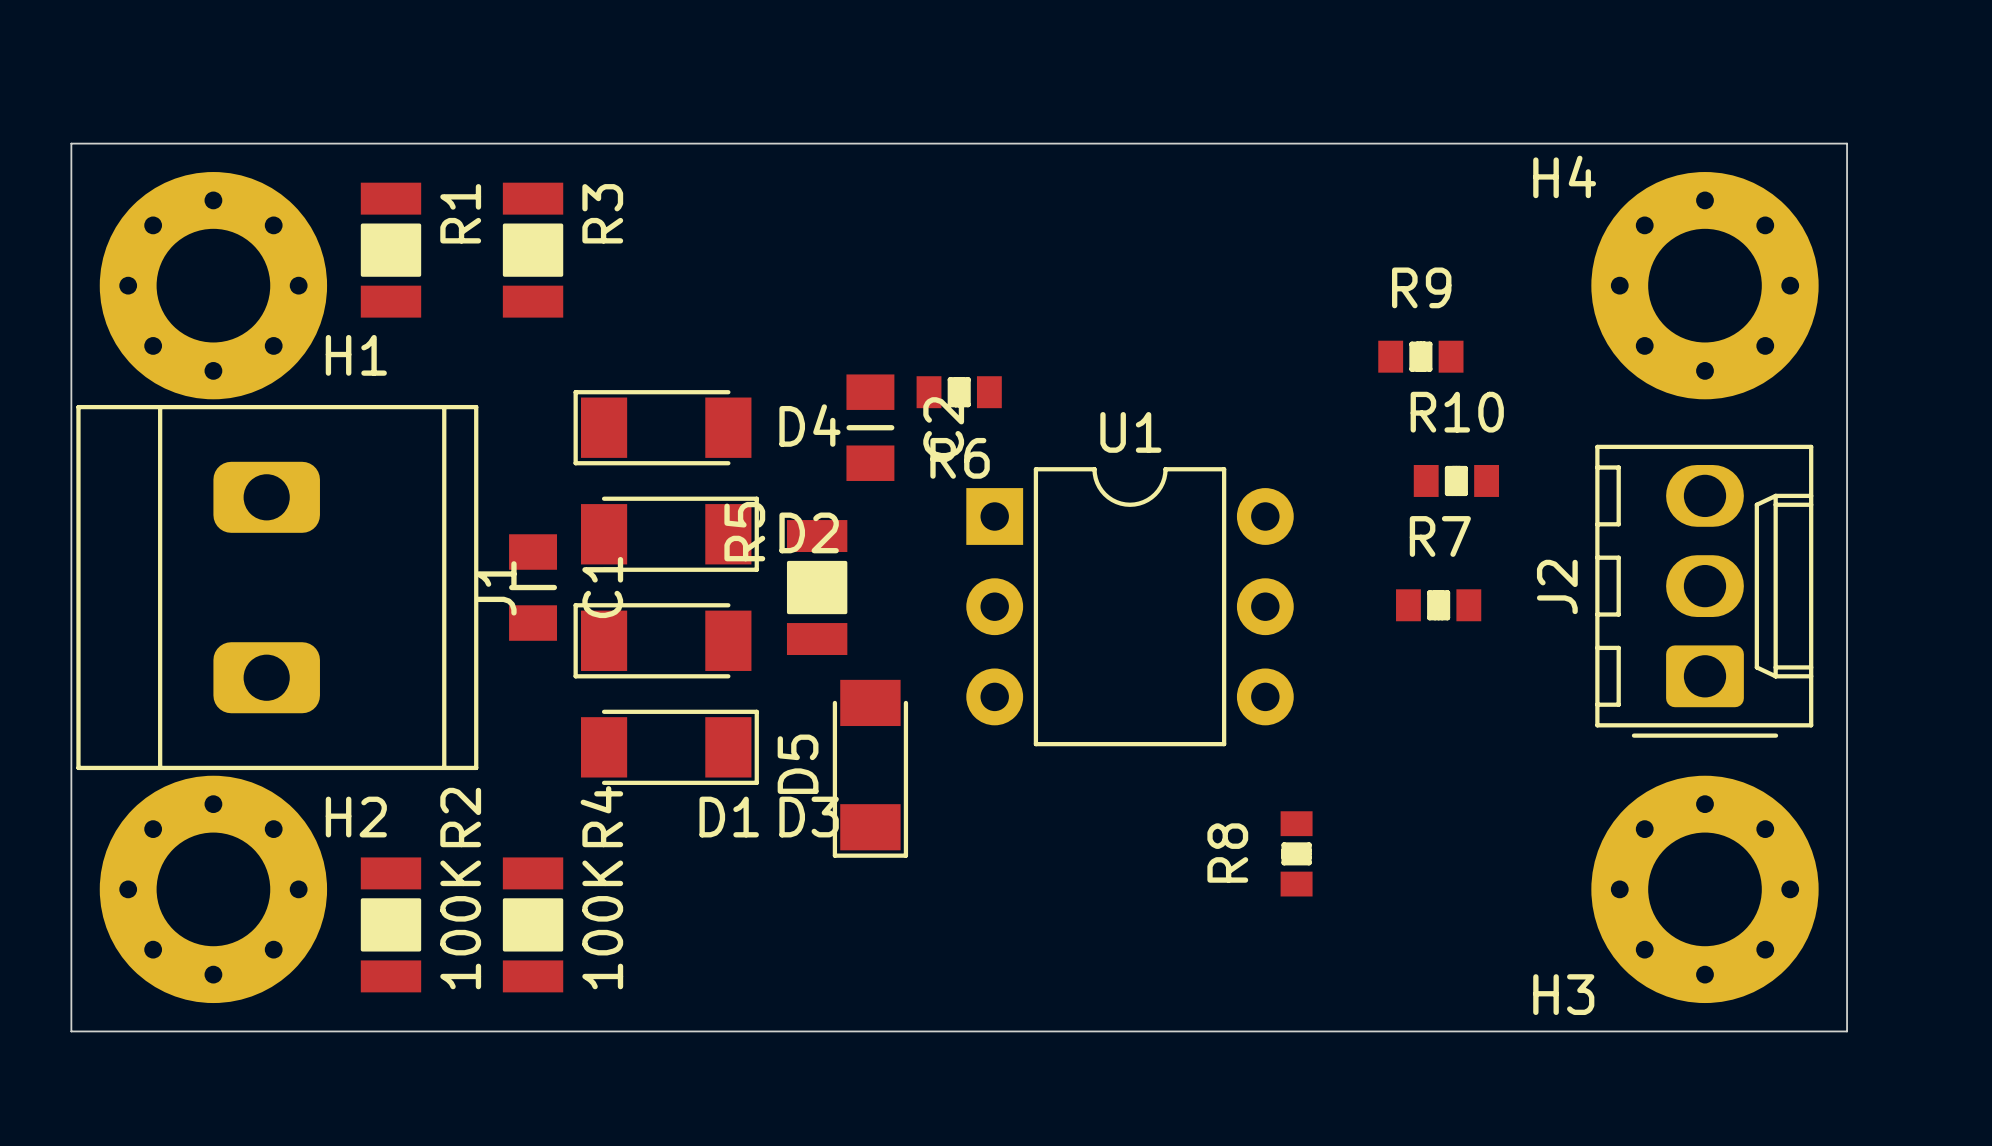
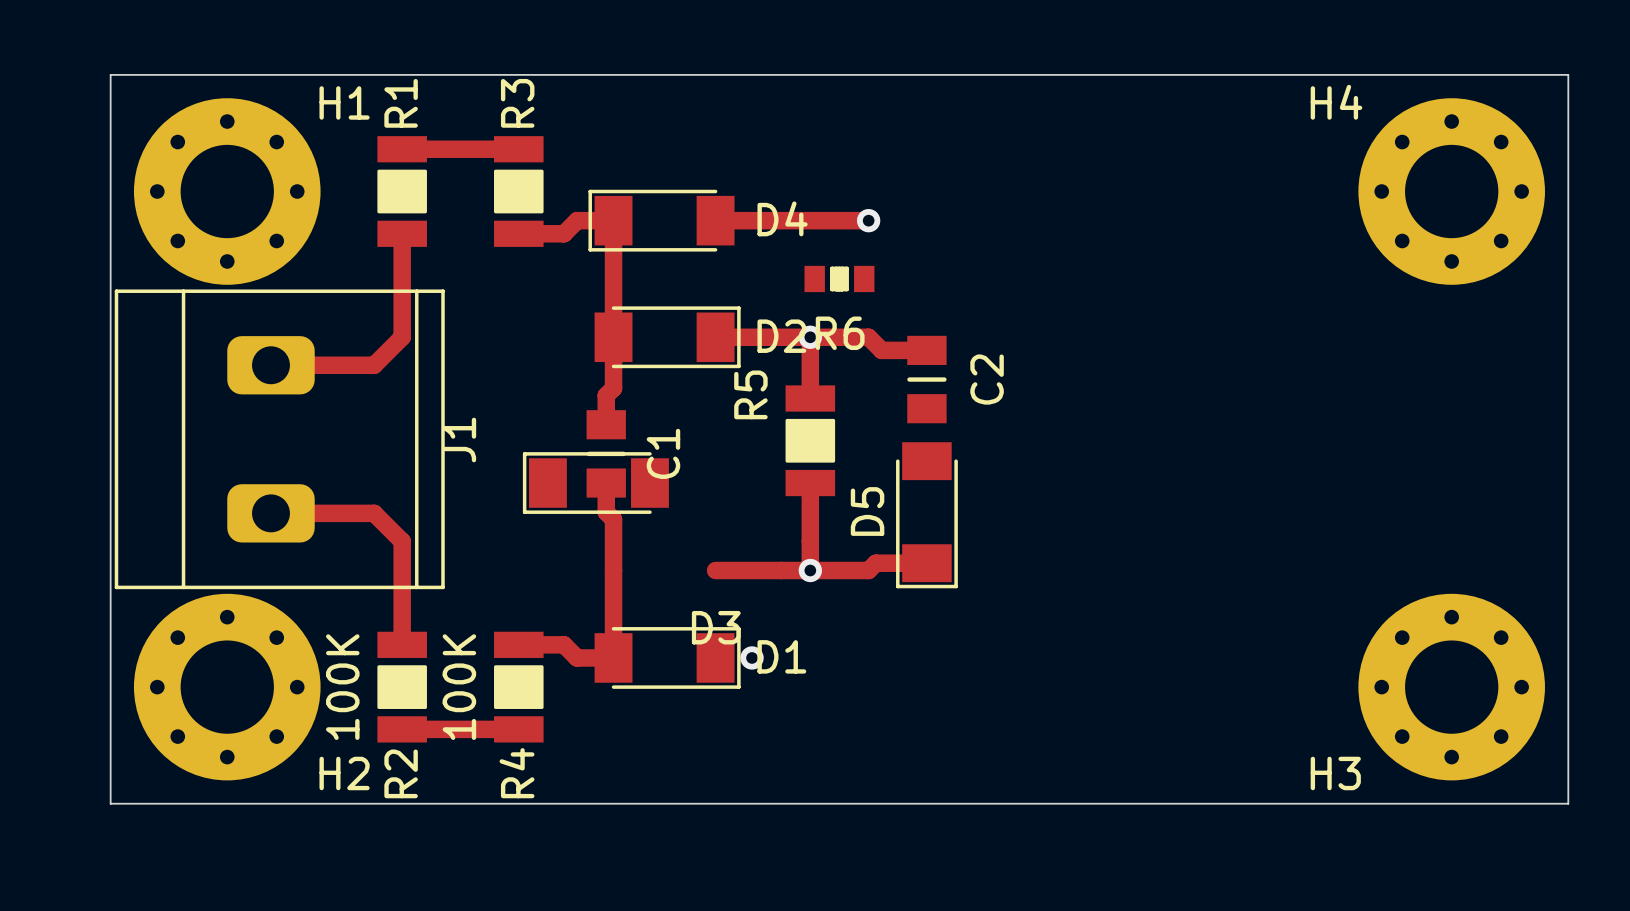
R1 name position: R1 (460, 213) -> R1 (401, 103)
R3 name position: R3 (602, 213) -> R3 (517, 103)
track: none -> (402, 149) (518, 149)
R1 position: (390, 250) -> (402, 191)
R3 position: (533, 250) -> (518, 191)
track: none -> (715, 220) (868, 220)
via: none -> (868, 220)
track: none -> (402, 233) (402, 337) (374, 365) (270, 365)
track: none -> (518, 233) (563, 233) (577, 220) (613, 220) (613, 388) (606, 395) (606, 424)
H1 name position: H1 (356, 355) -> H1 (344, 102)
R9: (1420, 356) -> none
D4 position: (662, 427) -> (661, 220)
C2 position: (870, 427) -> (926, 379)
track: none -> (715, 337) (868, 337) (881, 350) (926, 350)
track: none -> (810, 337) (810, 398)
via: none -> (810, 337)
R10: (1456, 480) -> none
D2 position: (669, 534) -> (667, 337)
C1 position: (533, 587) -> (606, 453)
R5 position: (817, 587) -> (810, 440)
J2: (1704, 591) -> none
R7: (1438, 605) -> none
U1: (1130, 606) -> none
track: none -> (606, 483) (606, 512) (613, 519) (613, 657) (577, 657) (563, 644) (518, 644)
track: none -> (810, 483) (810, 570)
track: none -> (270, 513) (374, 513) (402, 541) (402, 644)
track: none -> (926, 563) (875, 563) (868, 570) (715, 570)
D1 position: (669, 747) -> (667, 657)
via: none -> (810, 570)
D5 position: (870, 768) -> (926, 515)
R4 name position: R4 (601, 816) -> R4 (517, 773)
H2 name position: H2 (356, 817) -> H2 (344, 773)
R2 name position: R2 (460, 817) -> R2 (401, 773)
D1 name position: D1 (729, 817) -> D1 (781, 656)
via: none -> (752, 657)
R8: (1296, 853) -> none
R2 position: (390, 924) -> (402, 687)
R2 value position: 100K (460, 924) -> 100K (342, 687)
R4 position: (533, 924) -> (518, 687)
R4 value position: 100K (602, 924) -> 100K (459, 687)
track: none -> (402, 729) (518, 729)

